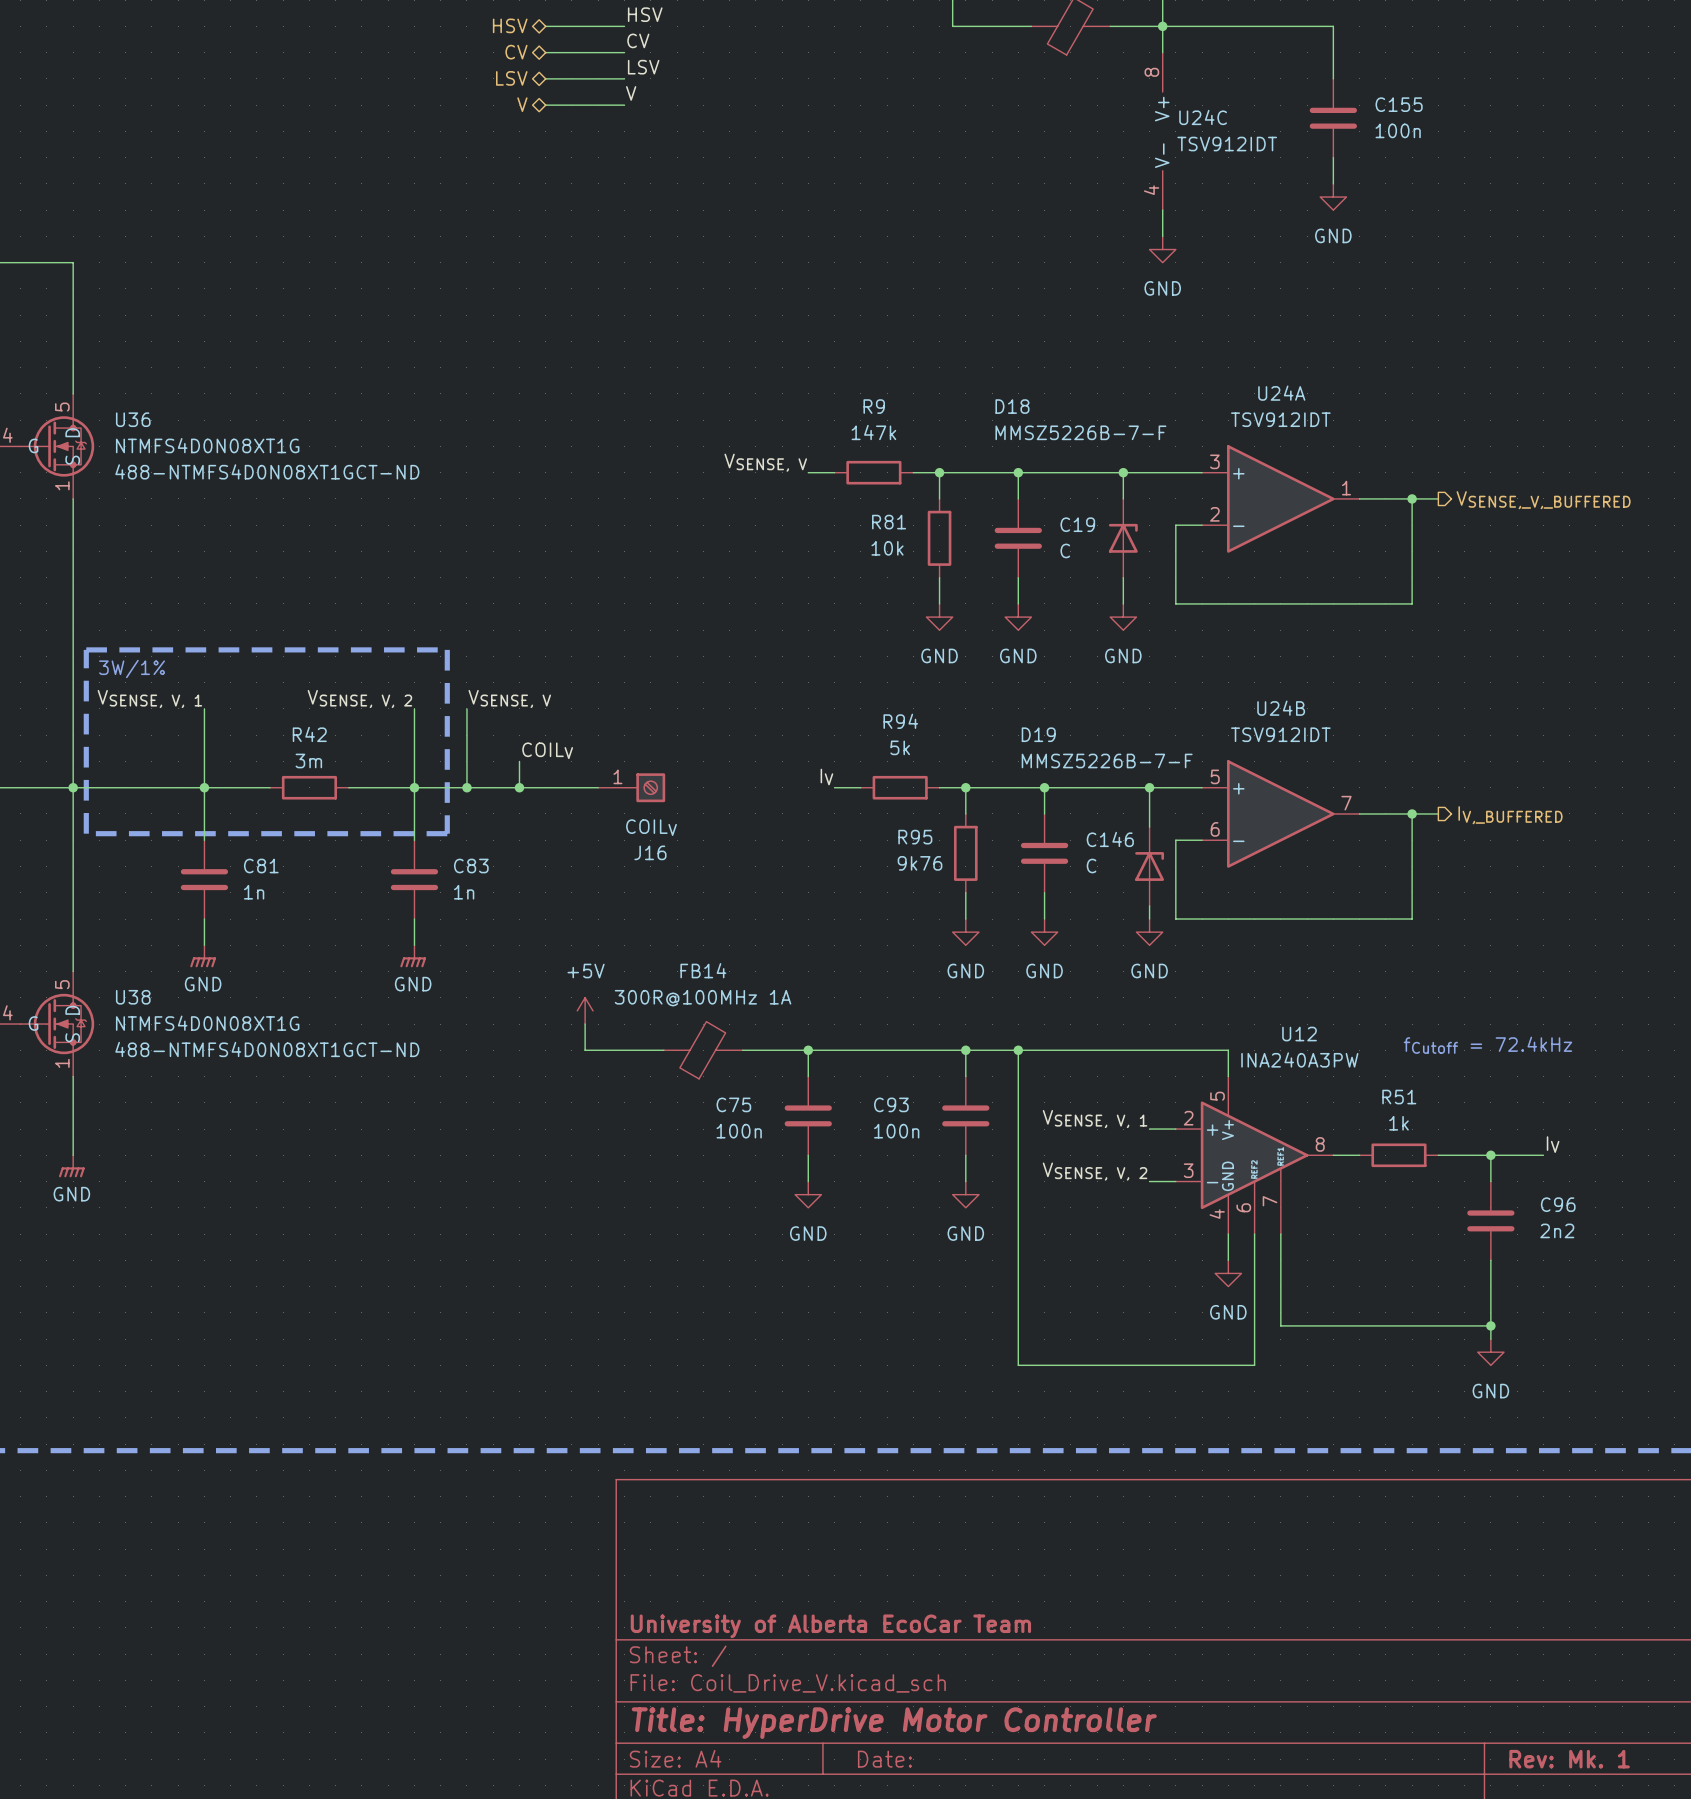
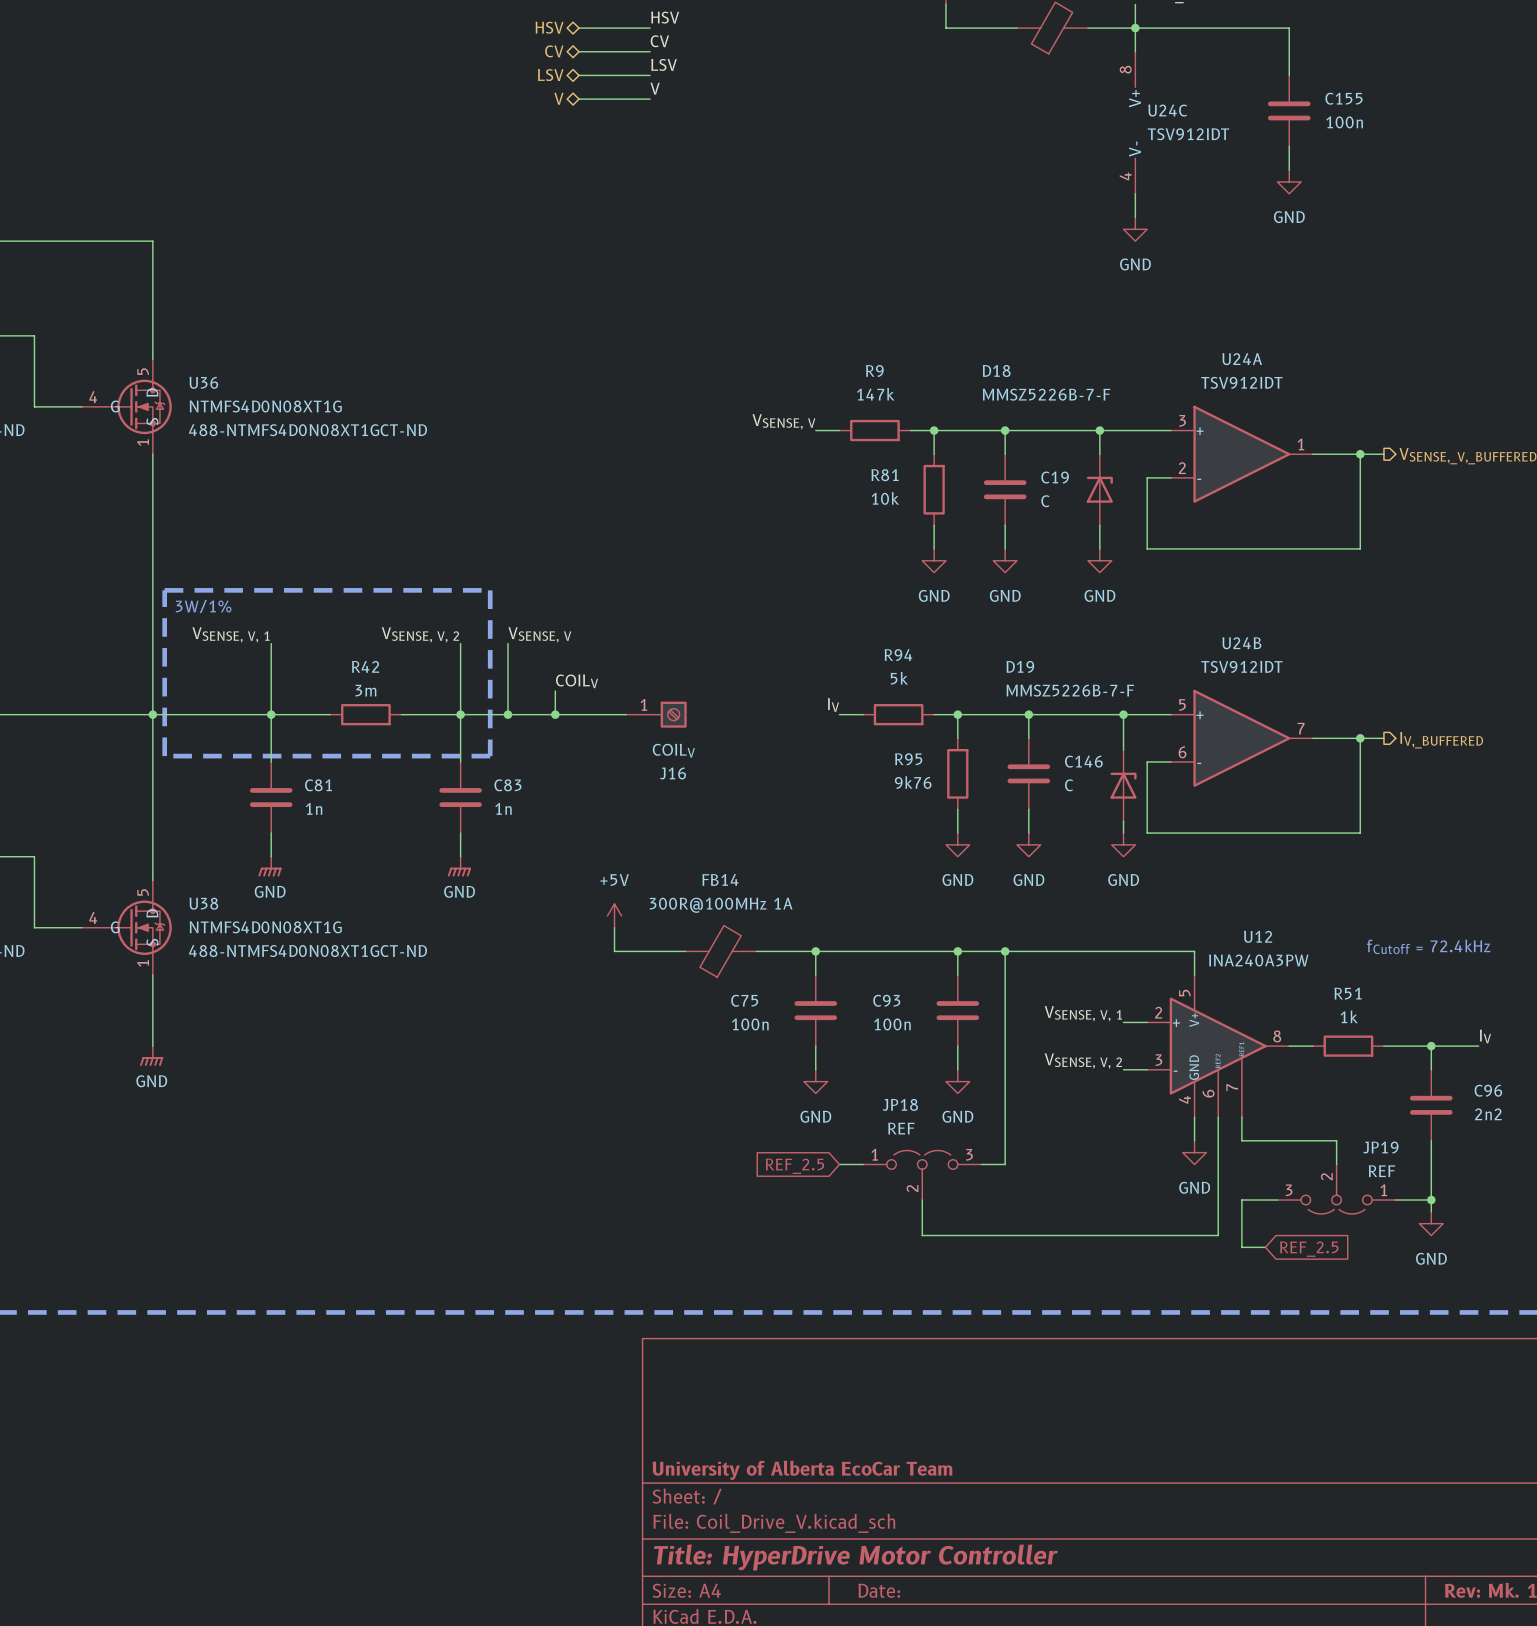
wire: (1280, 1260) (1280, 1325) -> (1241, 1140) (1336, 1140) (1336, 1164)
wire: none -> (839, 1164) (863, 1164)
wire: (1018, 1286) (1018, 1365) -> (1005, 1164) (981, 1164)
global label: none -> REF_2.5 (794, 1166)
JP18: none -> REF (922, 1175)
JP19: none -> REF (1336, 1189)
wire: none -> (922, 1200) (922, 1235) (1005, 1235)
wire: none -> (1241, 1200) (1241, 1247) (1265, 1247)
wire: (1320, 1325) (1451, 1325) -> none
global label: none -> REF_2.5 (1309, 1249)

